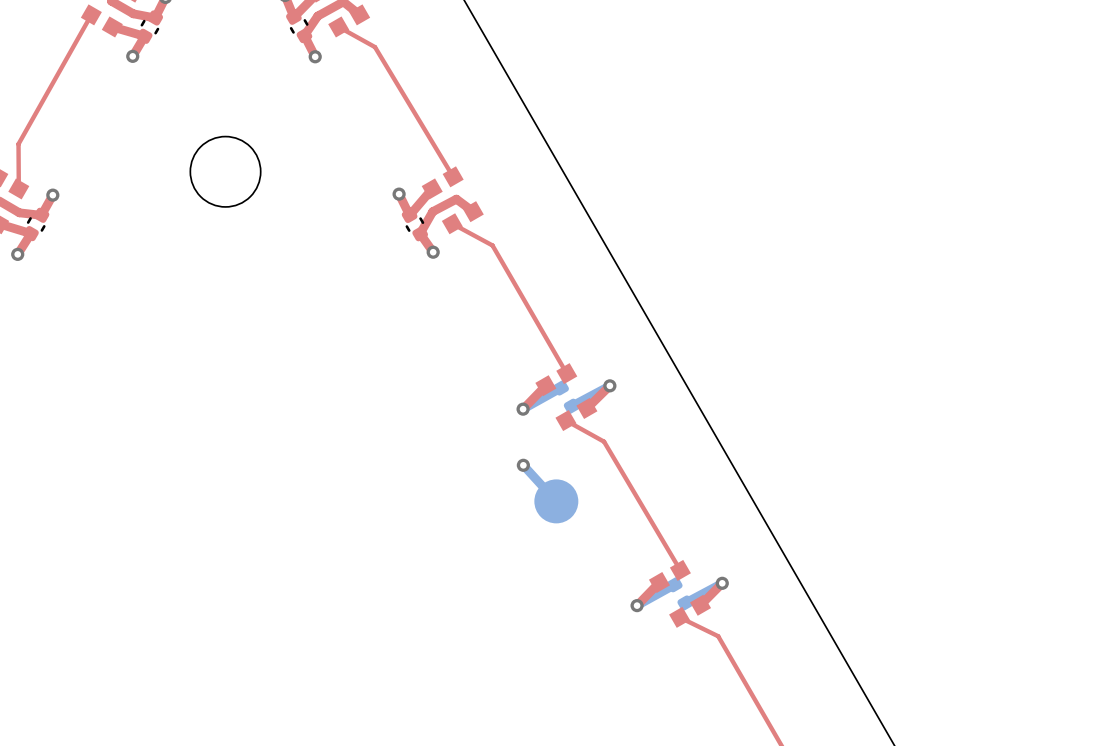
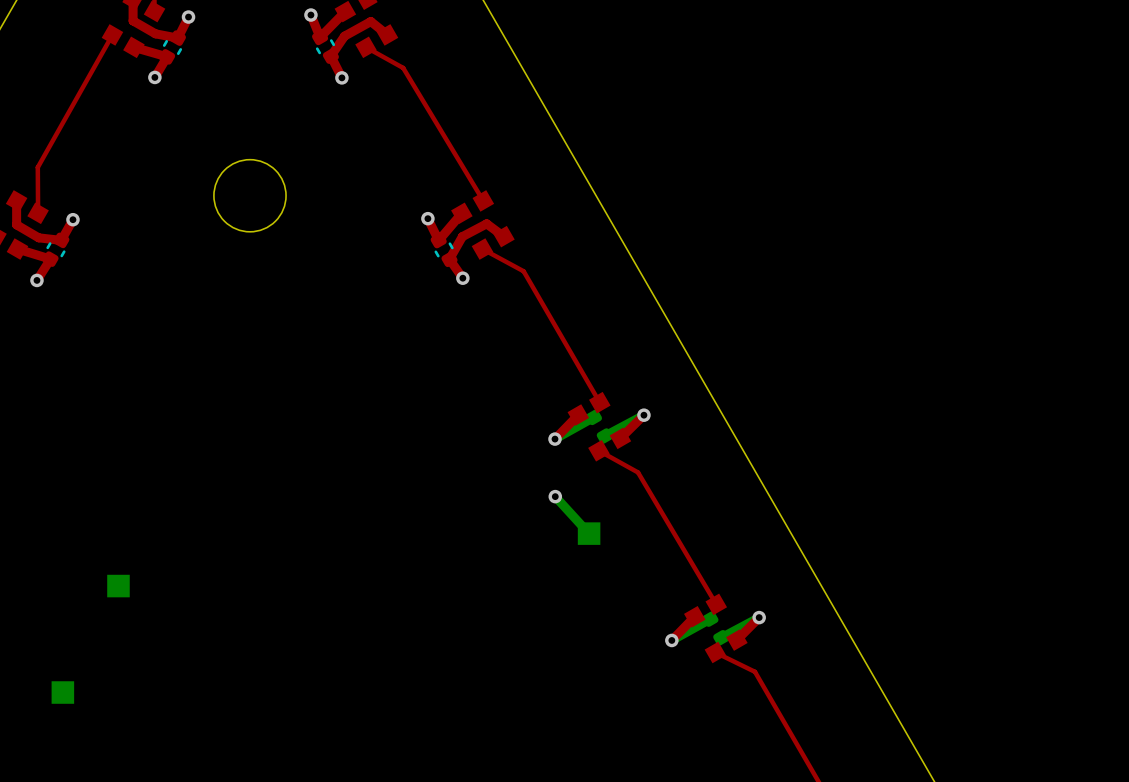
part footprint: [534, 479, 579, 524] -> [577, 522, 601, 545]
part: none -> (118, 586)
part: none -> (62, 692)

